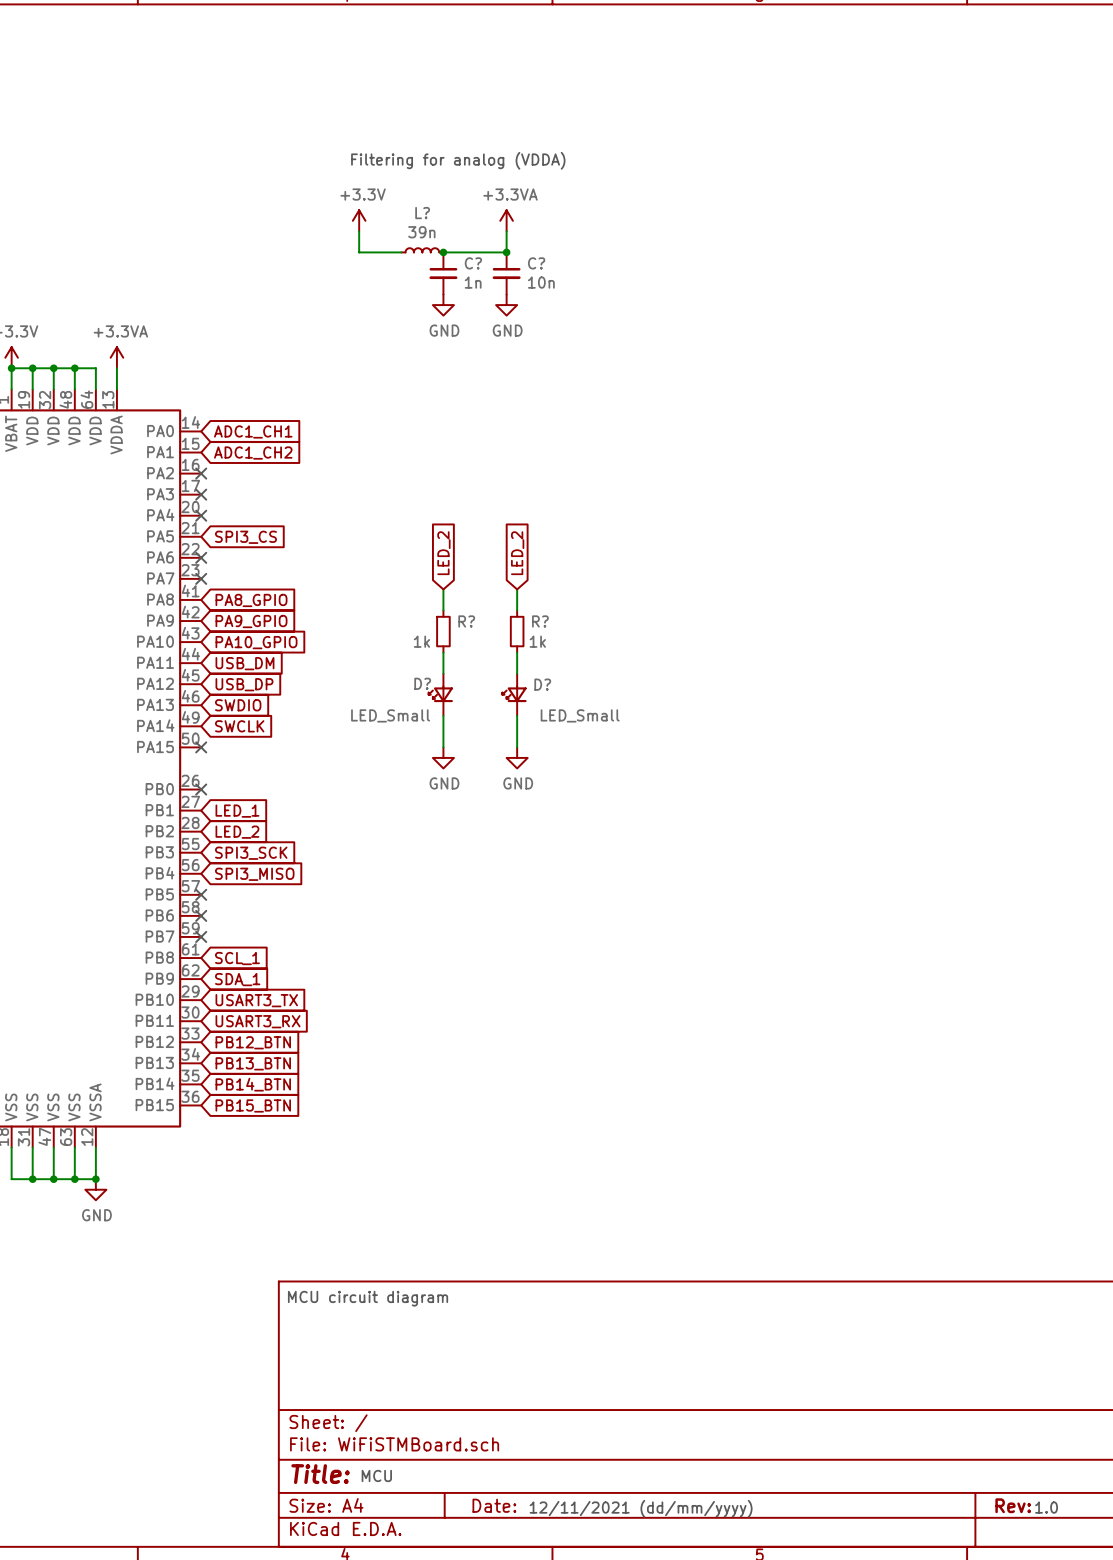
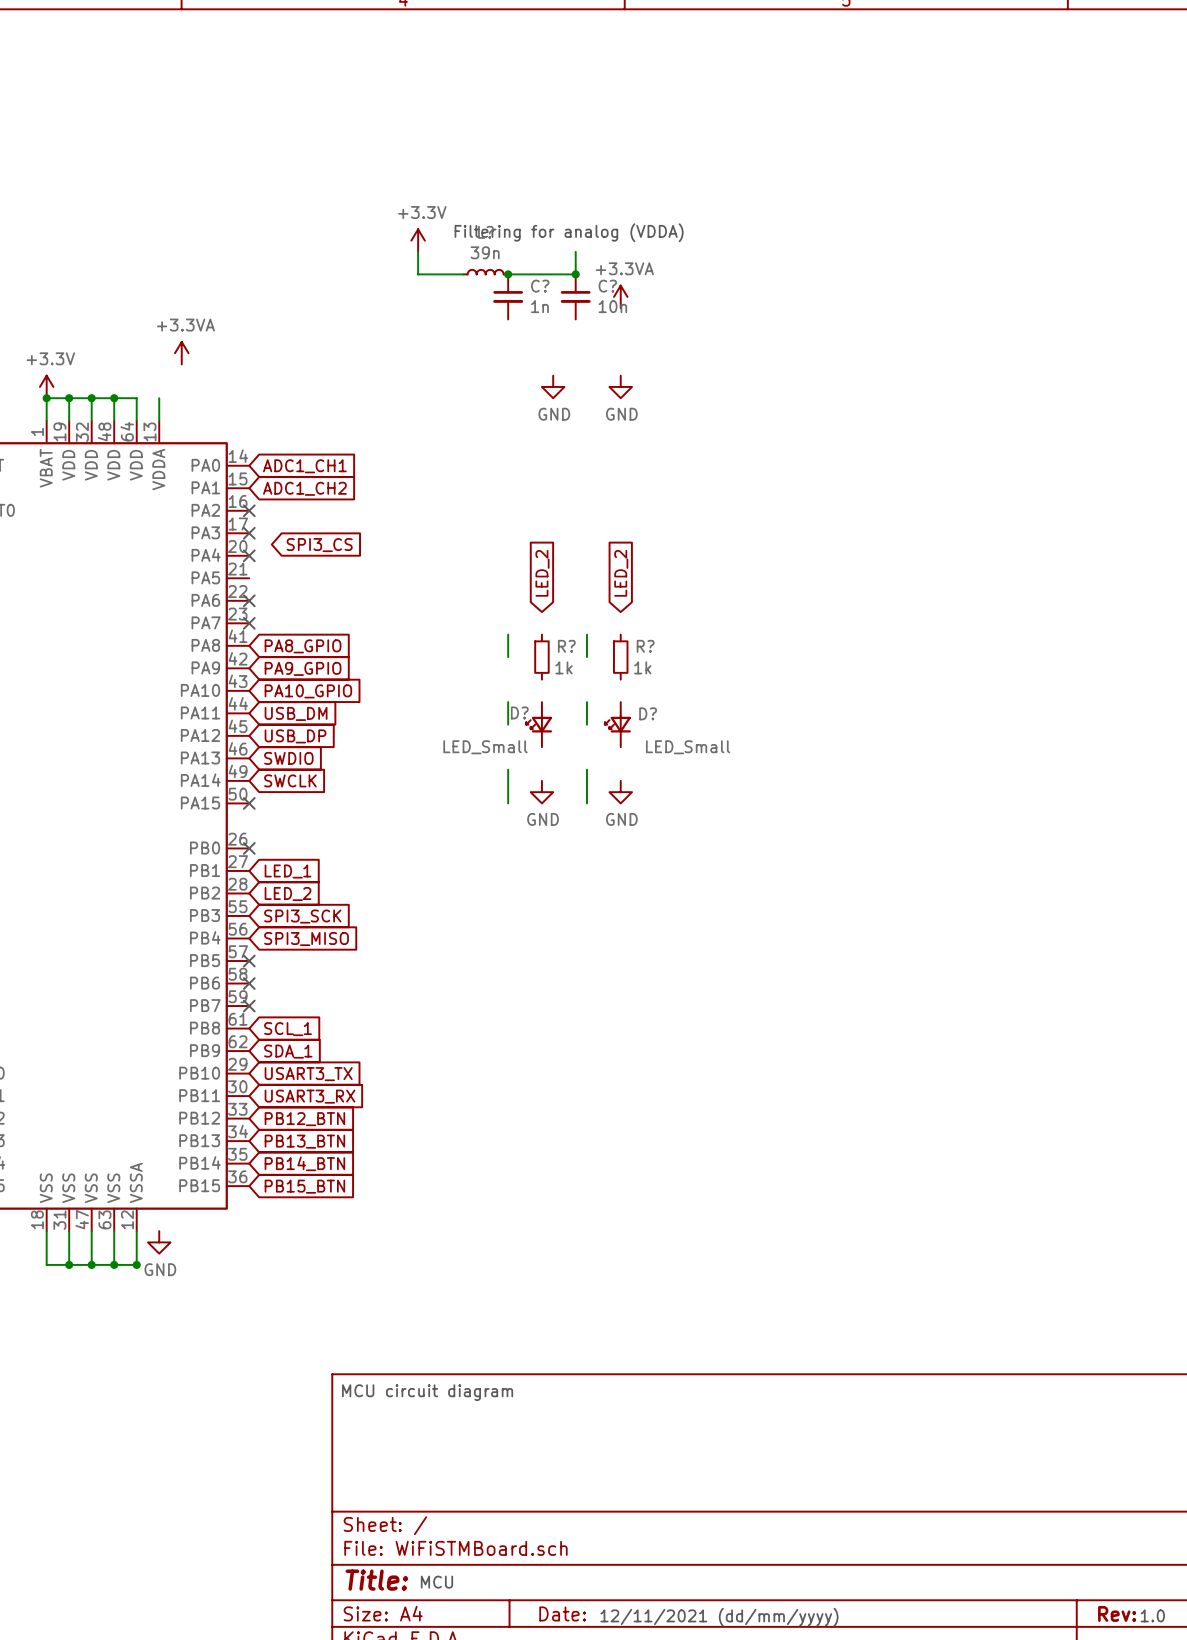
text position: Filtering for analog (VDDA) (458, 160) -> Filtering for analog (VDDA) (569, 232)
power symbol position: +3.3VA (506, 220) -> +3.3VA (620, 296)
power symbol: GND (443, 305) -> none
power symbol: GND (506, 305) -> none
power symbol position: +3.3VA (116, 357) -> +3.3VA (181, 353)
power symbol: none -> GND (553, 386)
power symbol: none -> GND (620, 386)
global label: none -> LED_2 (542, 573)
global label: none -> LED_2 (621, 573)
global label position: SPI3_CS (245, 537) -> SPI3_CS (319, 545)
global label: LED_2 (443, 553) -> none
global label: LED_2 (517, 553) -> none
R?: none -> 1k (541, 657)
R?: none -> 1k (620, 657)
R?: 1k (443, 631) -> none
R?: 1k (517, 631) -> none
D?: none -> LED_Small (539, 724)
D?: none -> LED_Small (617, 724)
D?: LED_Small (440, 694) -> none
D?: LED_Small (514, 694) -> none
power symbol: none -> GND (541, 792)
power symbol: none -> GND (620, 792)
power symbol: GND (443, 757) -> none
power symbol: GND (517, 757) -> none
power symbol position: GND (95, 1189) -> GND (159, 1242)

